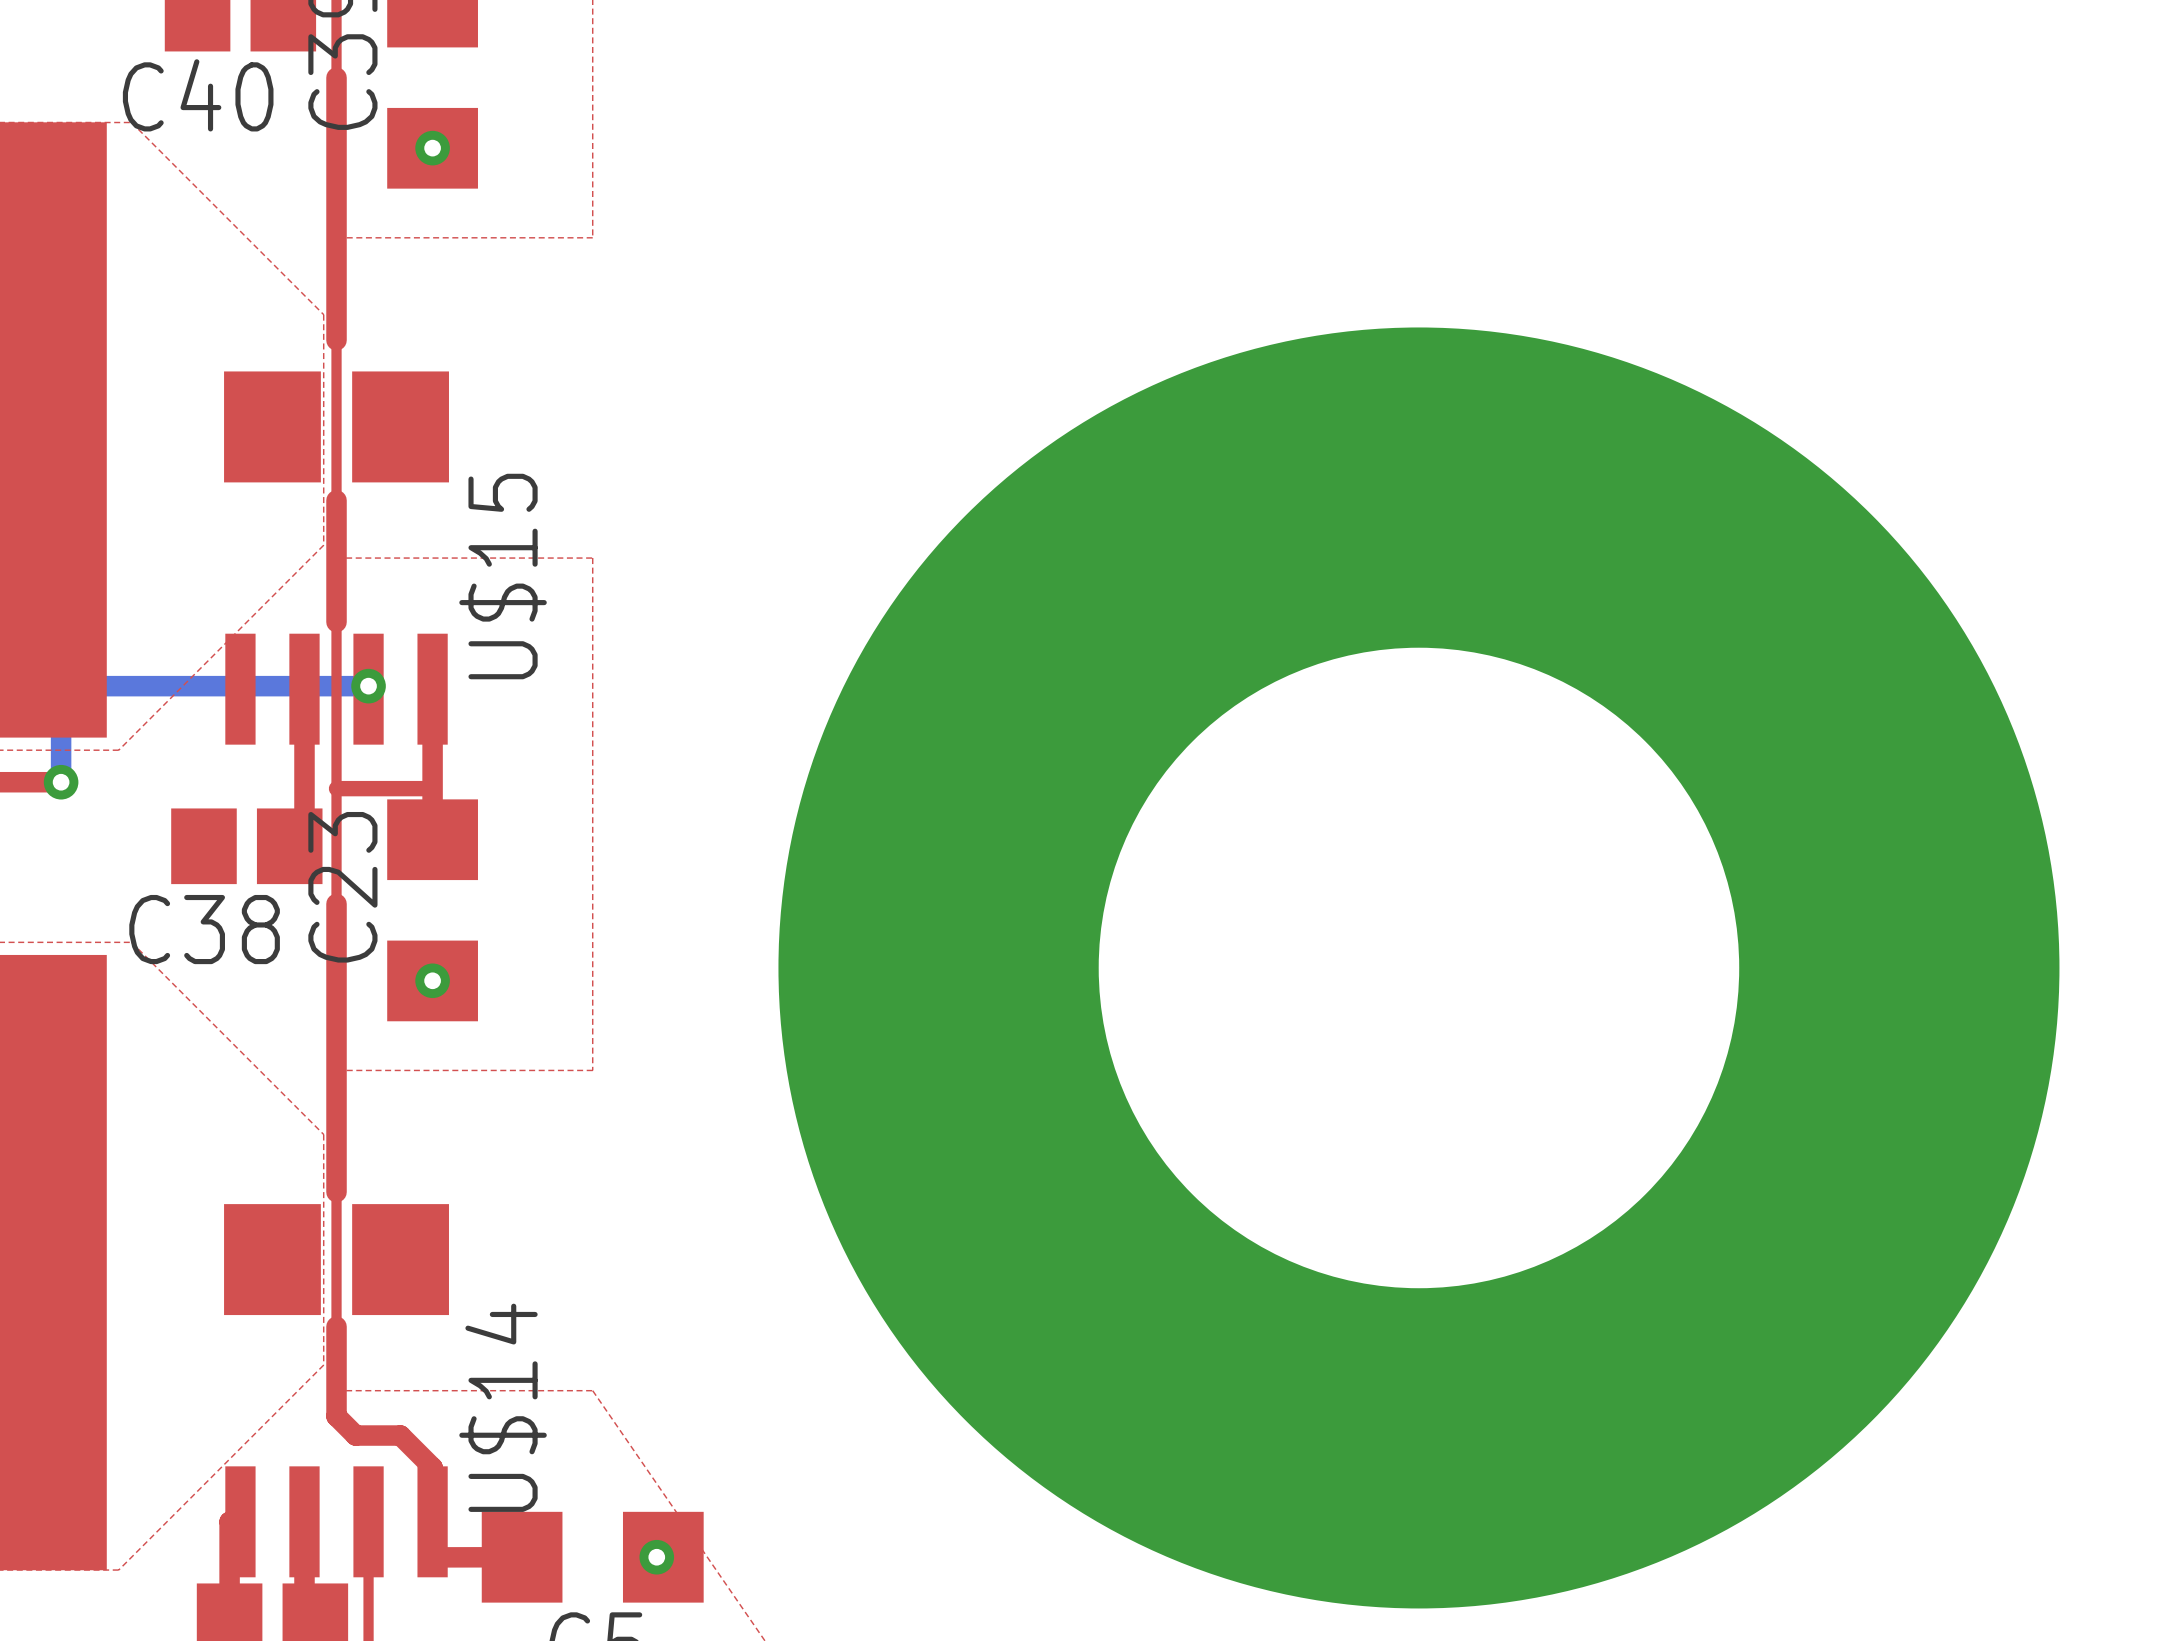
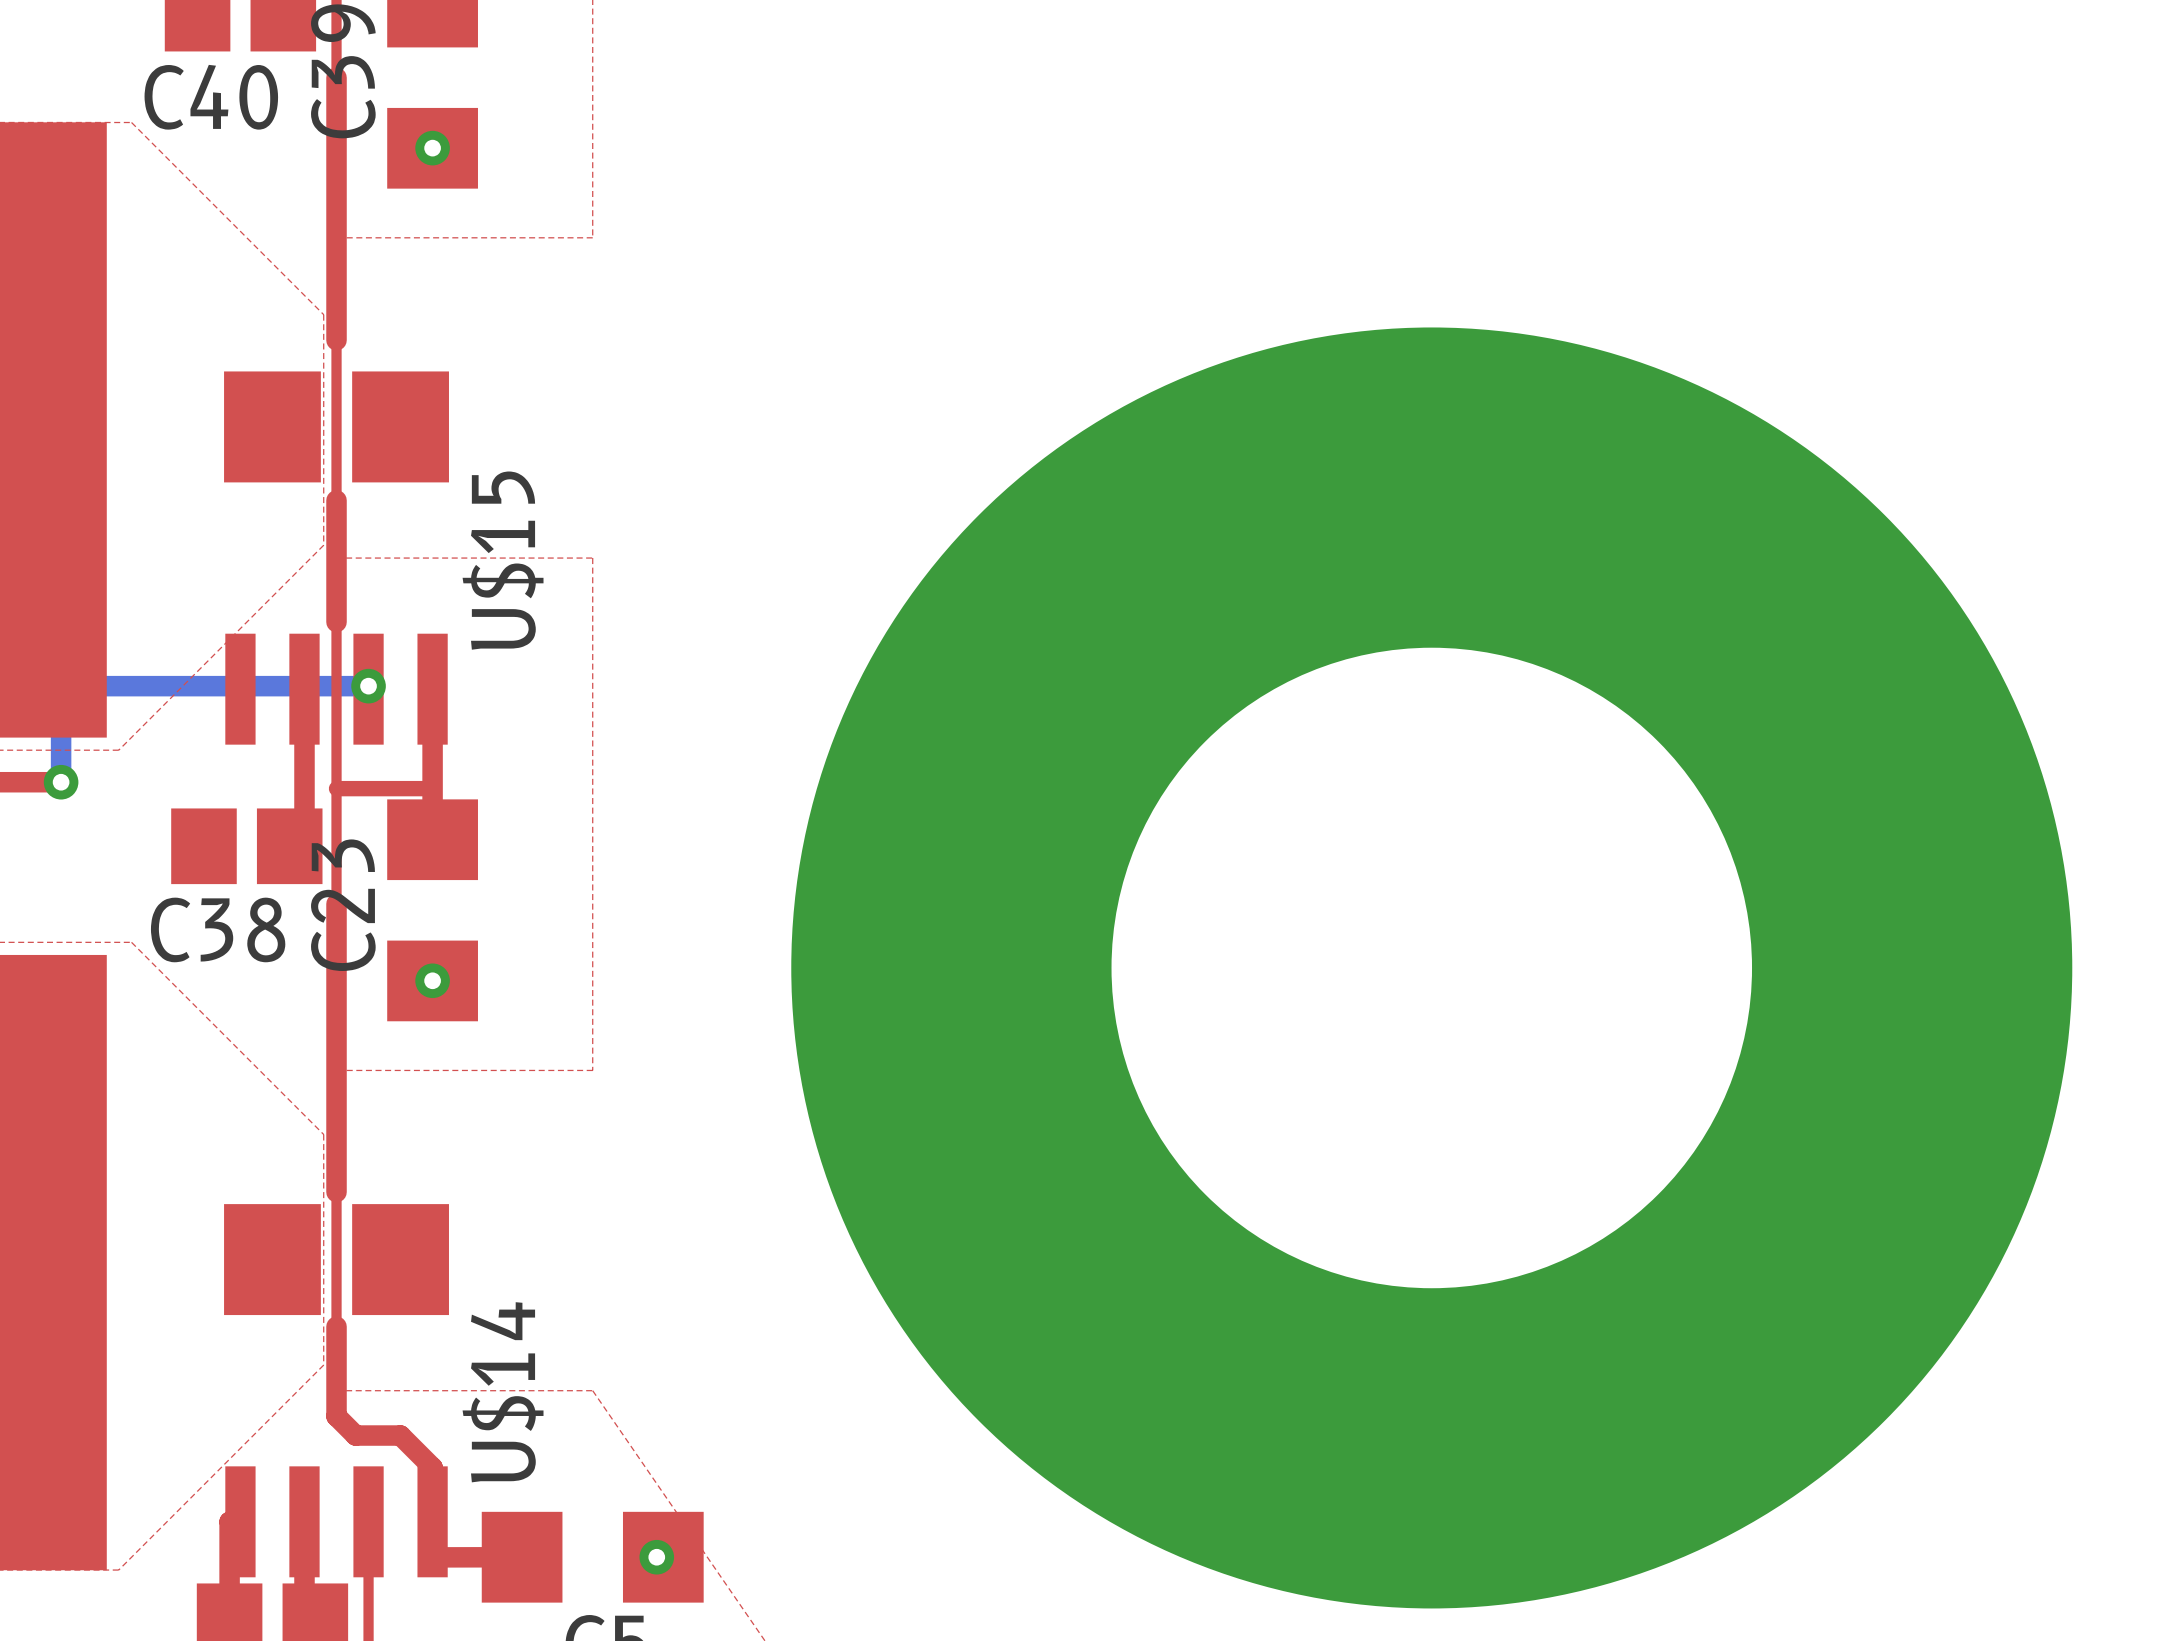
part position: (1418, 967) -> (1431, 967)

